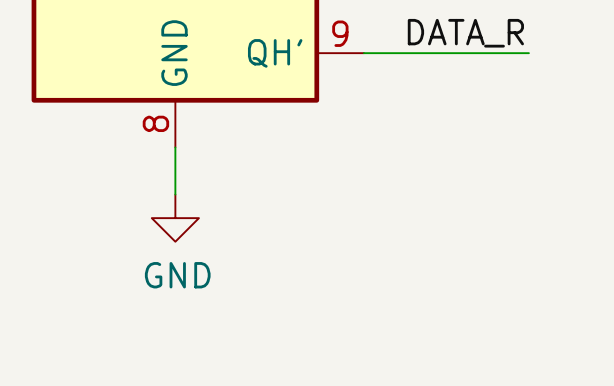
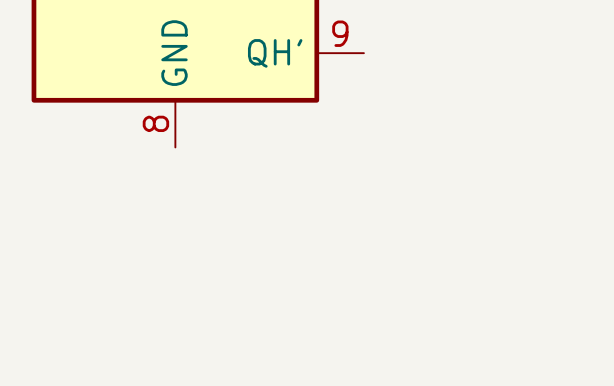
label: DATA_R (465, 33) -> none
wire: (363, 53) (528, 53) -> none
wire: (175, 147) (175, 194) -> none
power symbol: GND (175, 218) -> none

